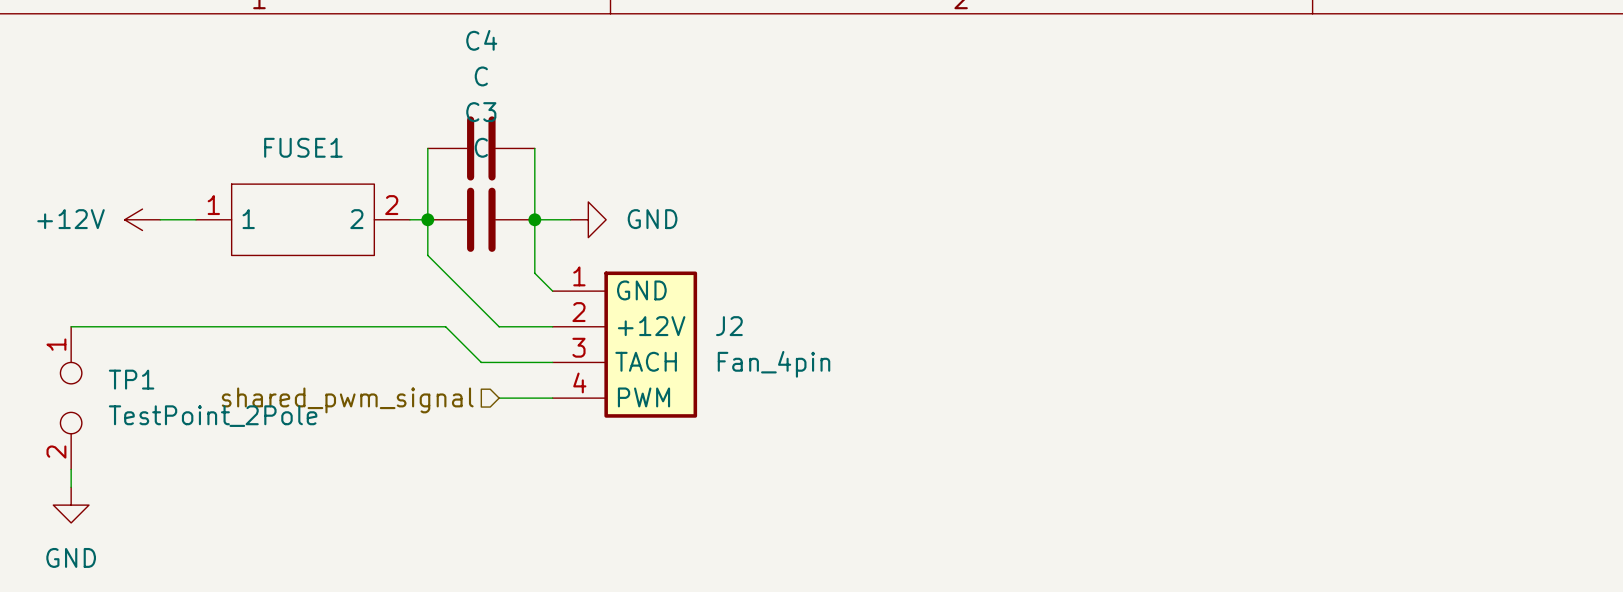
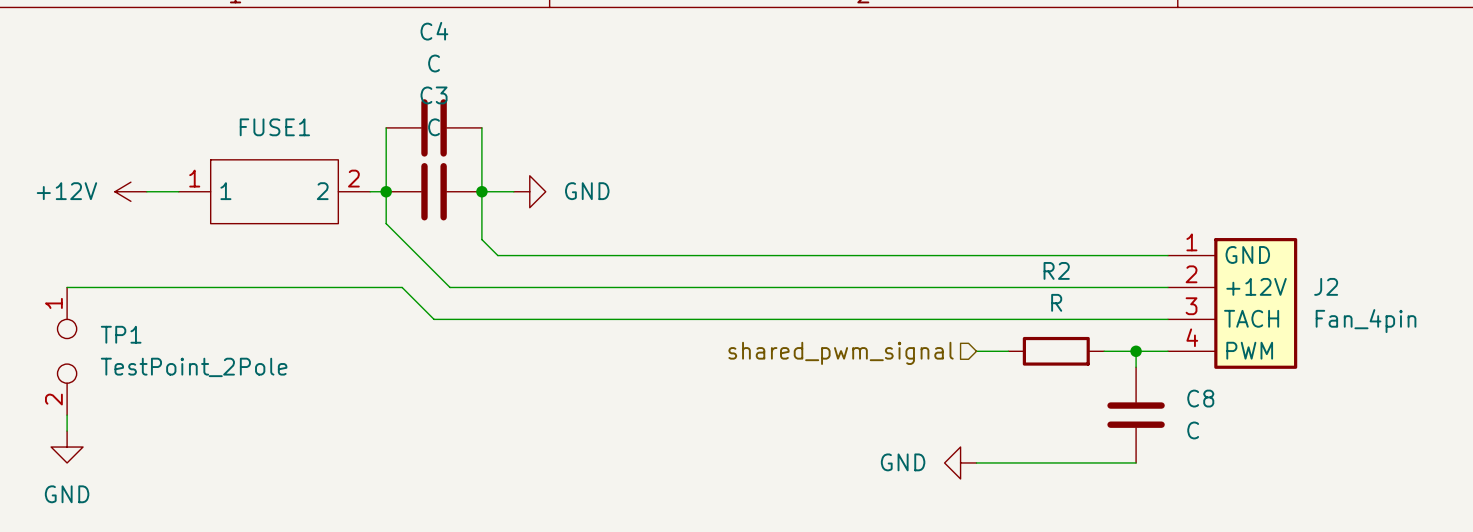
wire: none -> (497, 255) (1167, 255)
wire: none -> (497, 287) (1167, 287)
J2 position: (624, 344) -> (1232, 303)
wire: none -> (497, 319) (1167, 319)
wire: (499, 398) (552, 398) -> none
wire: none -> (976, 351) (1008, 351)
R2: none -> R (1056, 351)
wire: none -> (1104, 351) (1167, 351)
wire: none -> (1136, 351) (1136, 367)
junction: none -> (1136, 351)
hierarchical label: shared_pwm_signal (347, 400) -> none
hierarchical label: none -> shared_pwm_signal (841, 353)
C8: none -> C (1136, 415)
power symbol: none -> GND (960, 462)
wire: none -> (976, 462) (1136, 462)

